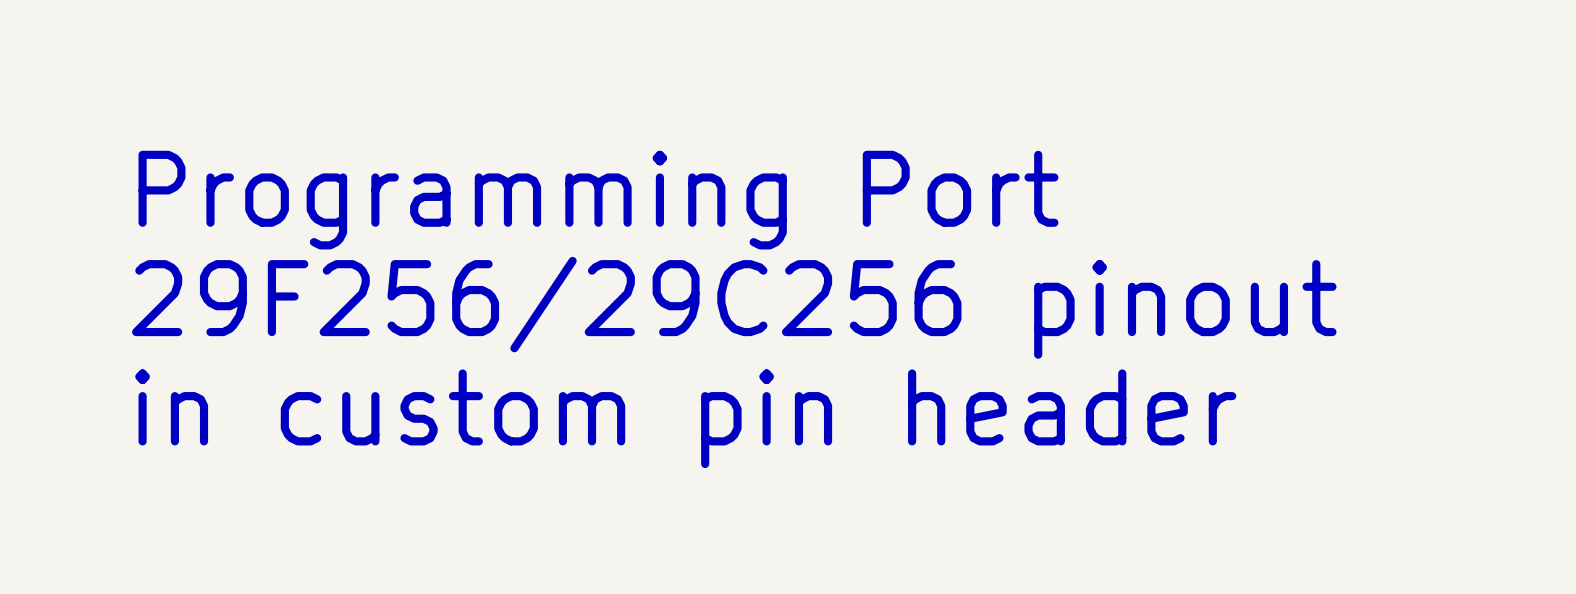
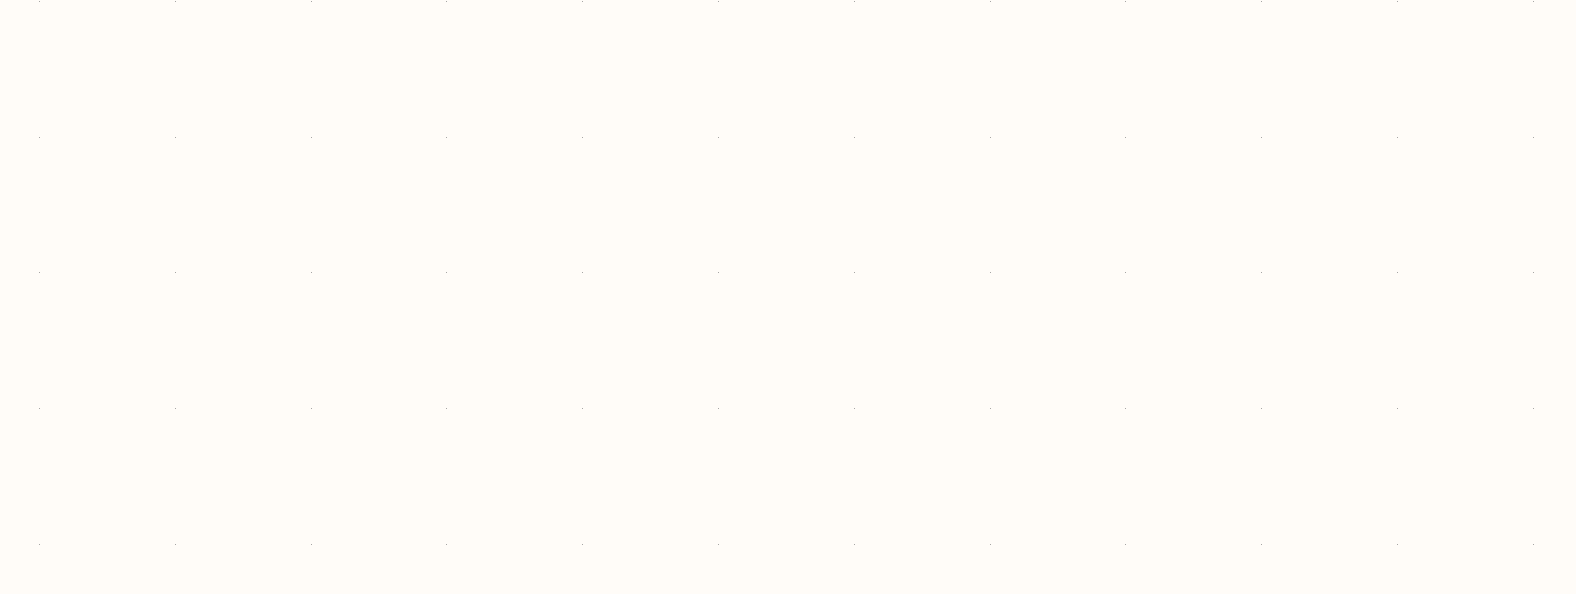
text: Programming Port (598, 200) -> none
text: 29F256/29C256 pinout (734, 307) -> none
text: in custom pin header (685, 418) -> none

